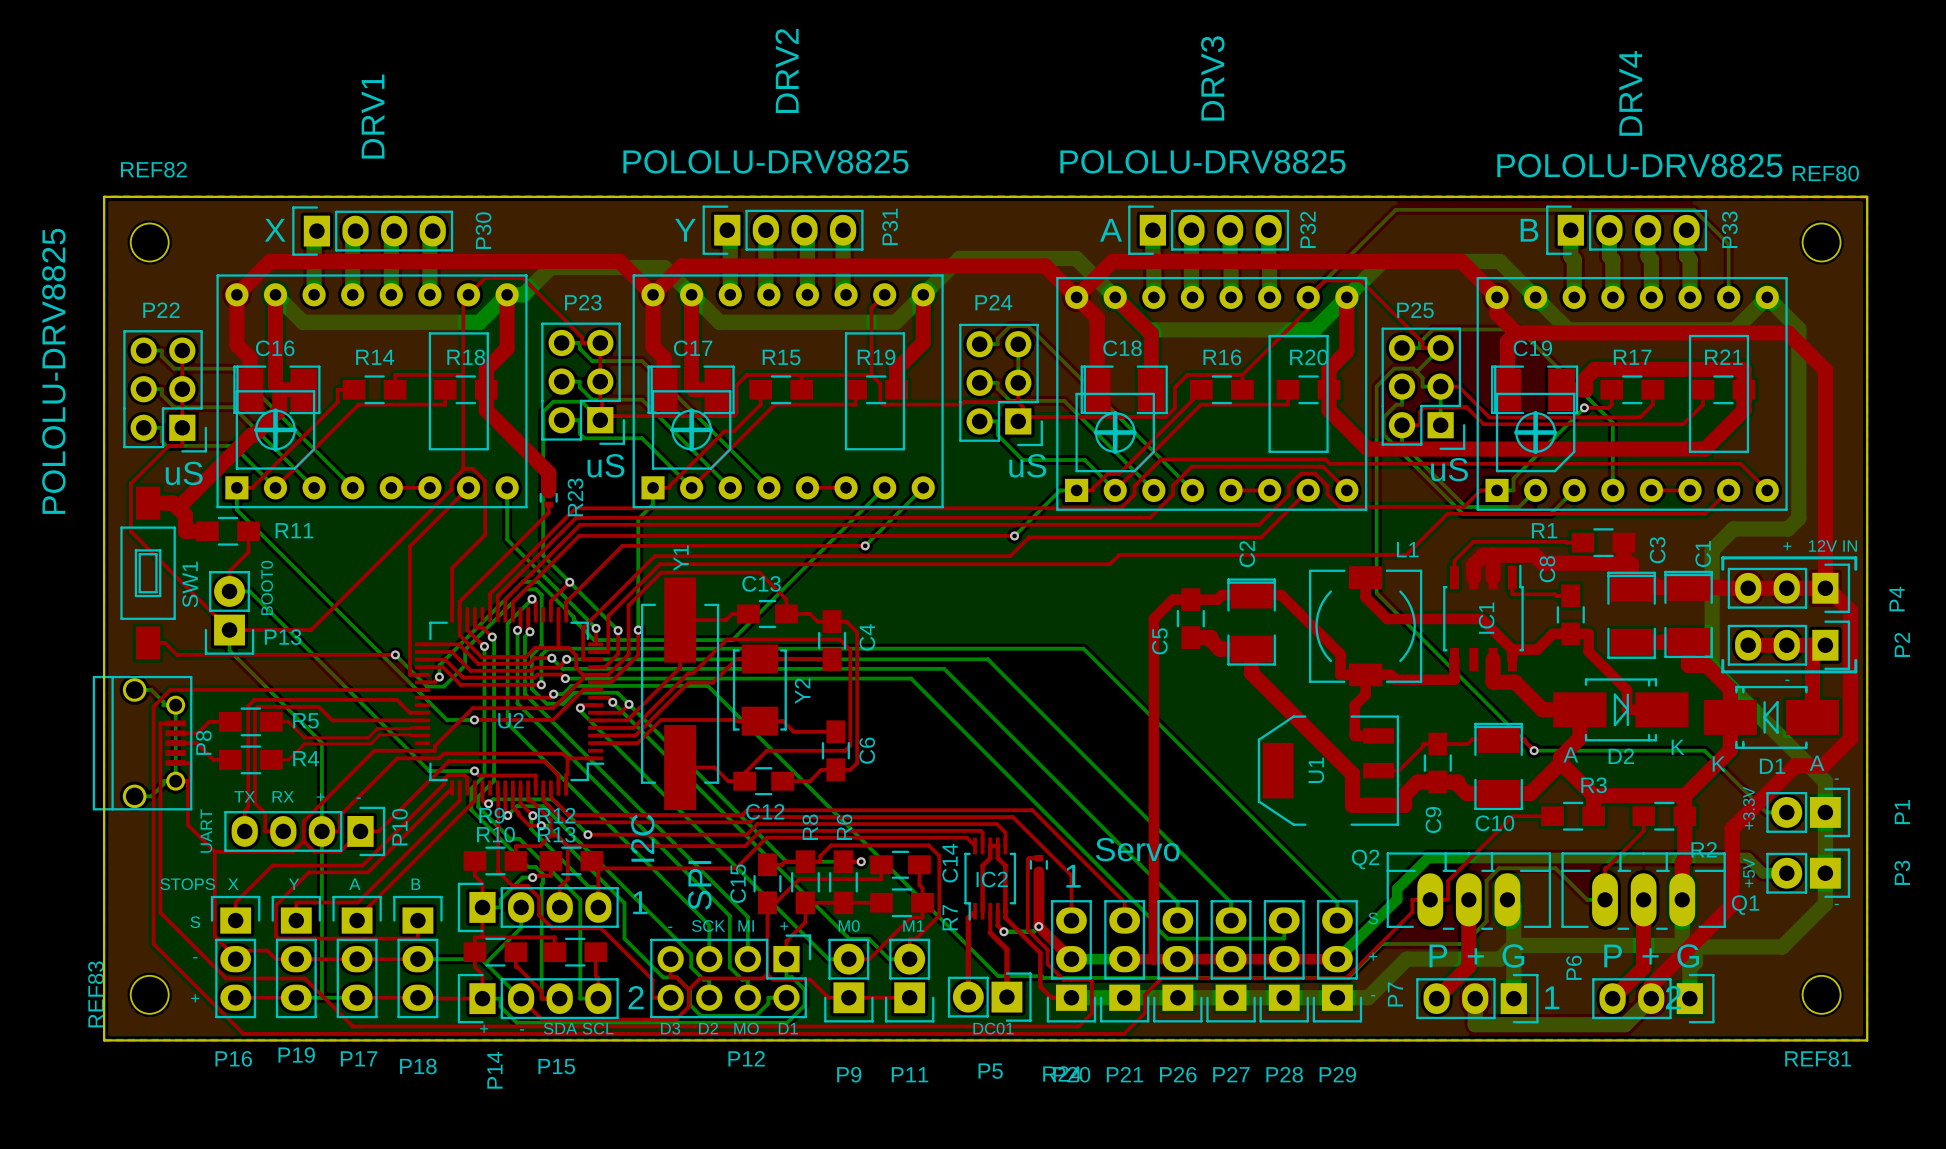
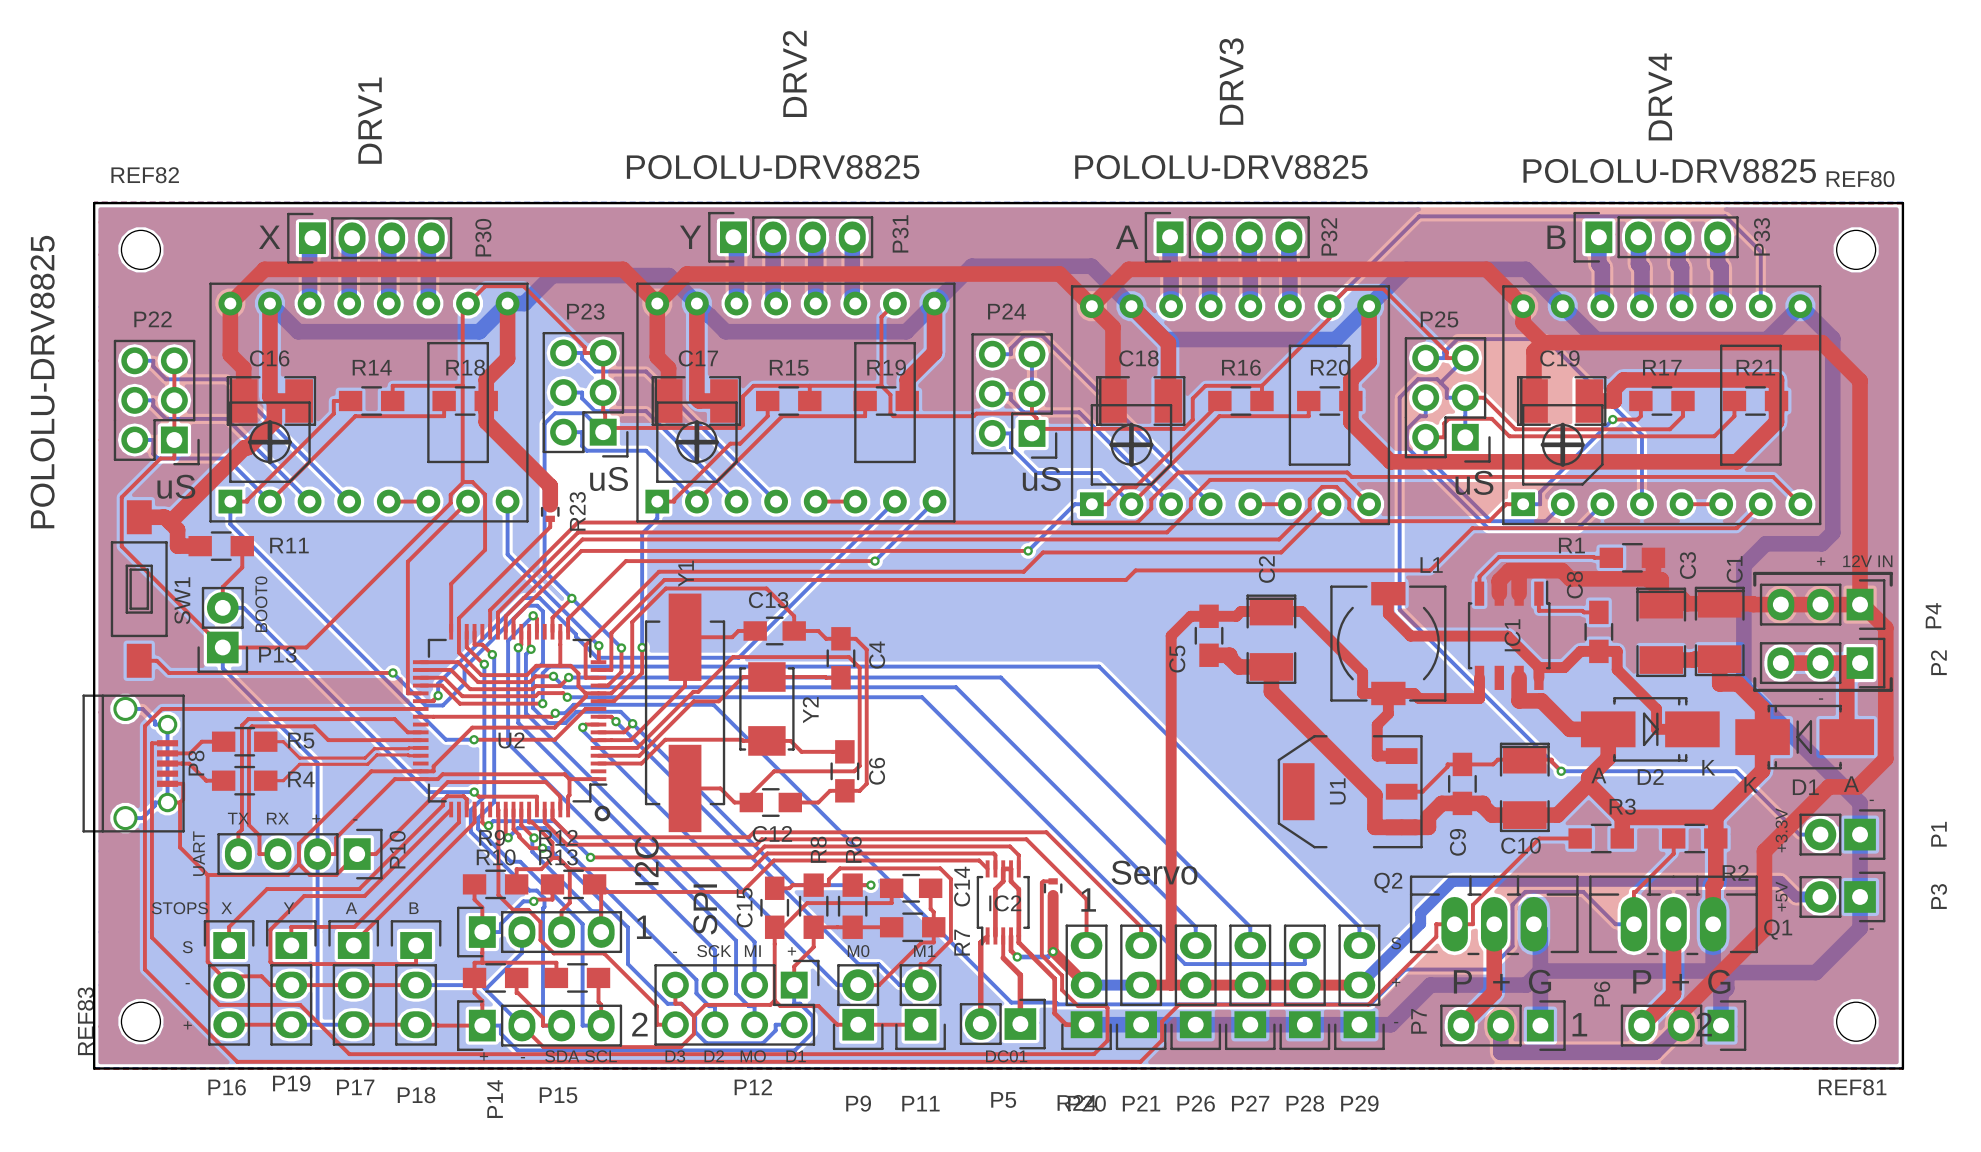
drawing: none -> [594, 805, 611, 822]

